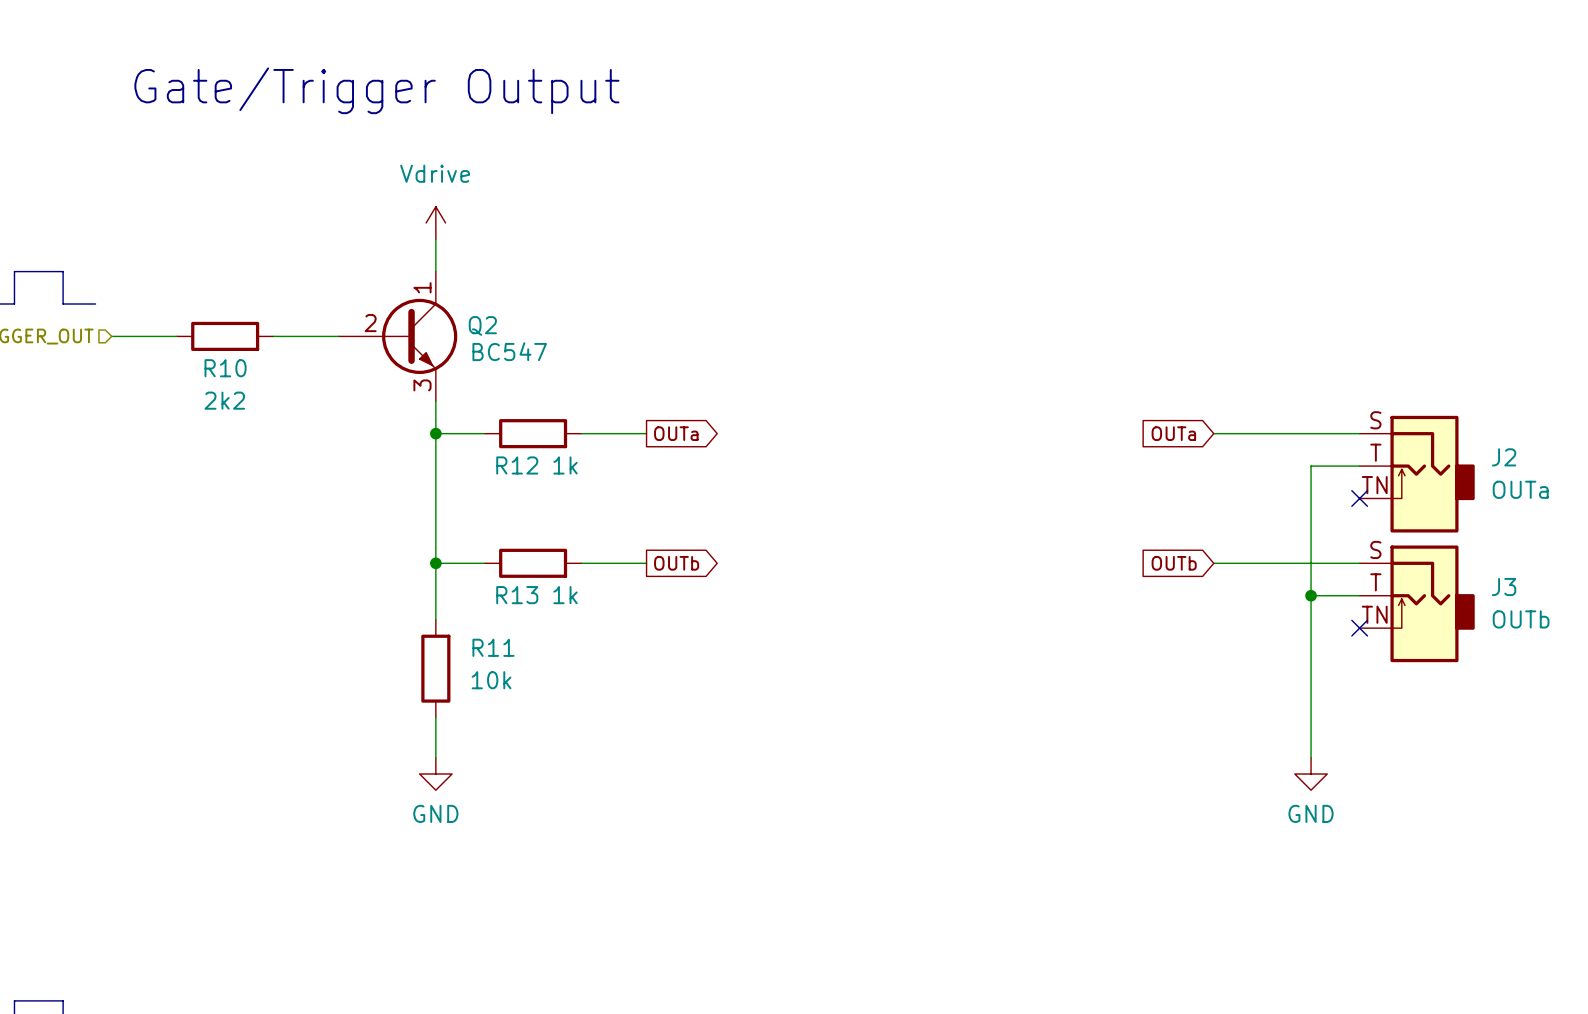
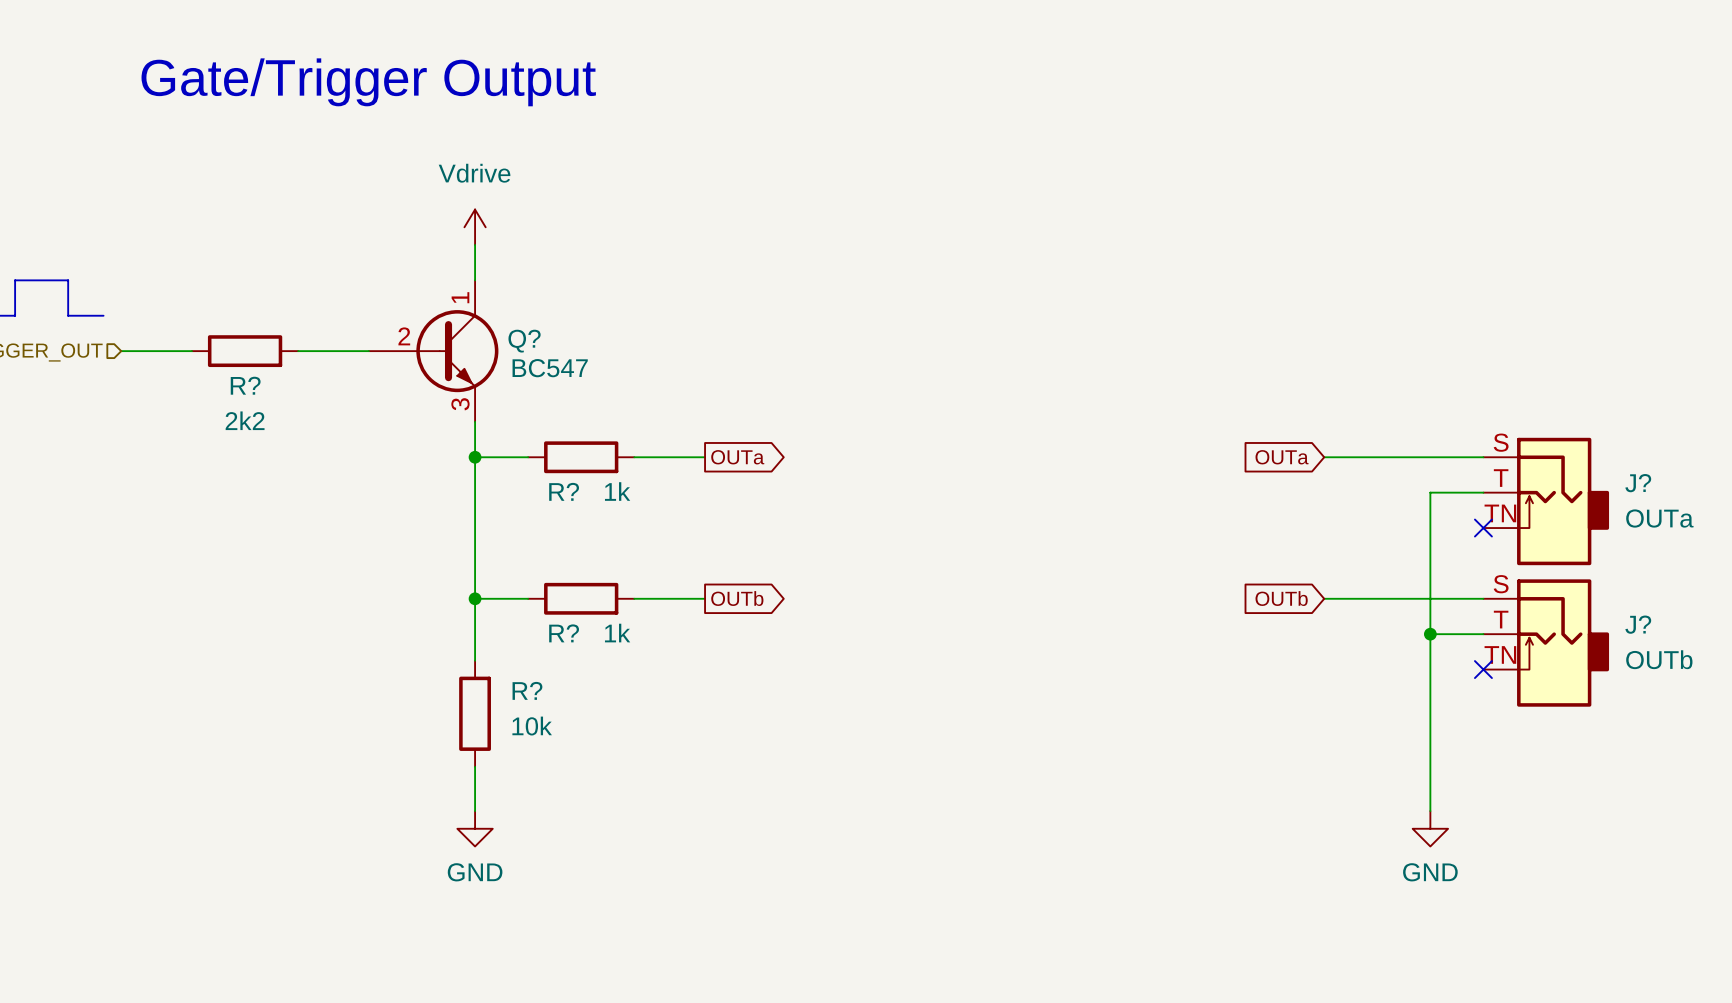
Q2 name: Q2 (482, 325) -> Q? (524, 341)
R10 name: R10 (225, 368) -> R? (245, 385)
J2 name: J2 (1504, 457) -> J? (1638, 483)
R12 name: R12 (517, 465) -> R? (564, 491)
J3 name: J3 (1504, 587) -> J? (1638, 624)
R13 name: R13 (517, 595) -> R? (564, 633)
R11 name: R11 (493, 647) -> R? (527, 690)

